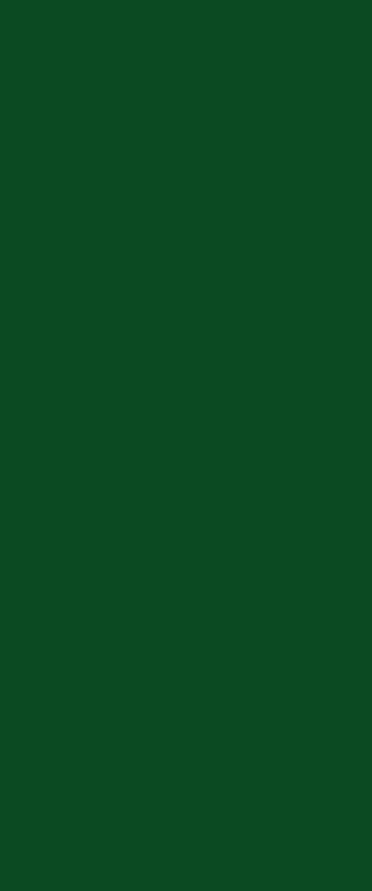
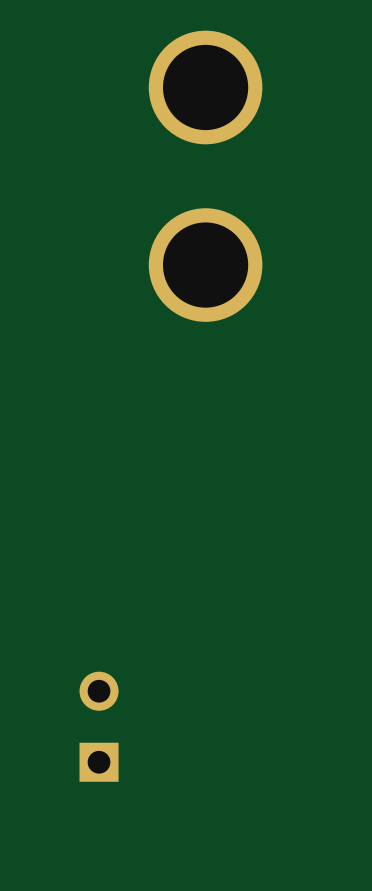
part: none -> (205, 87)
part: none -> (205, 265)
part: none -> (99, 726)

